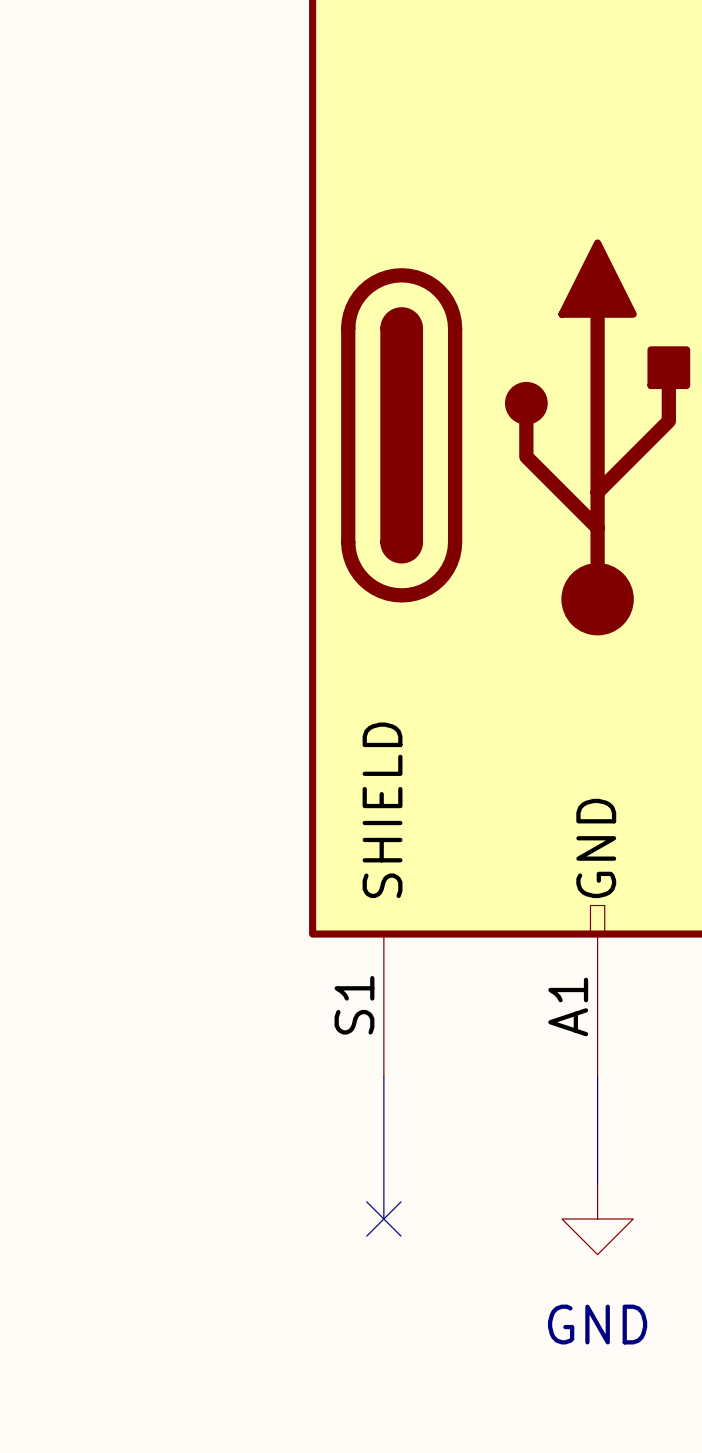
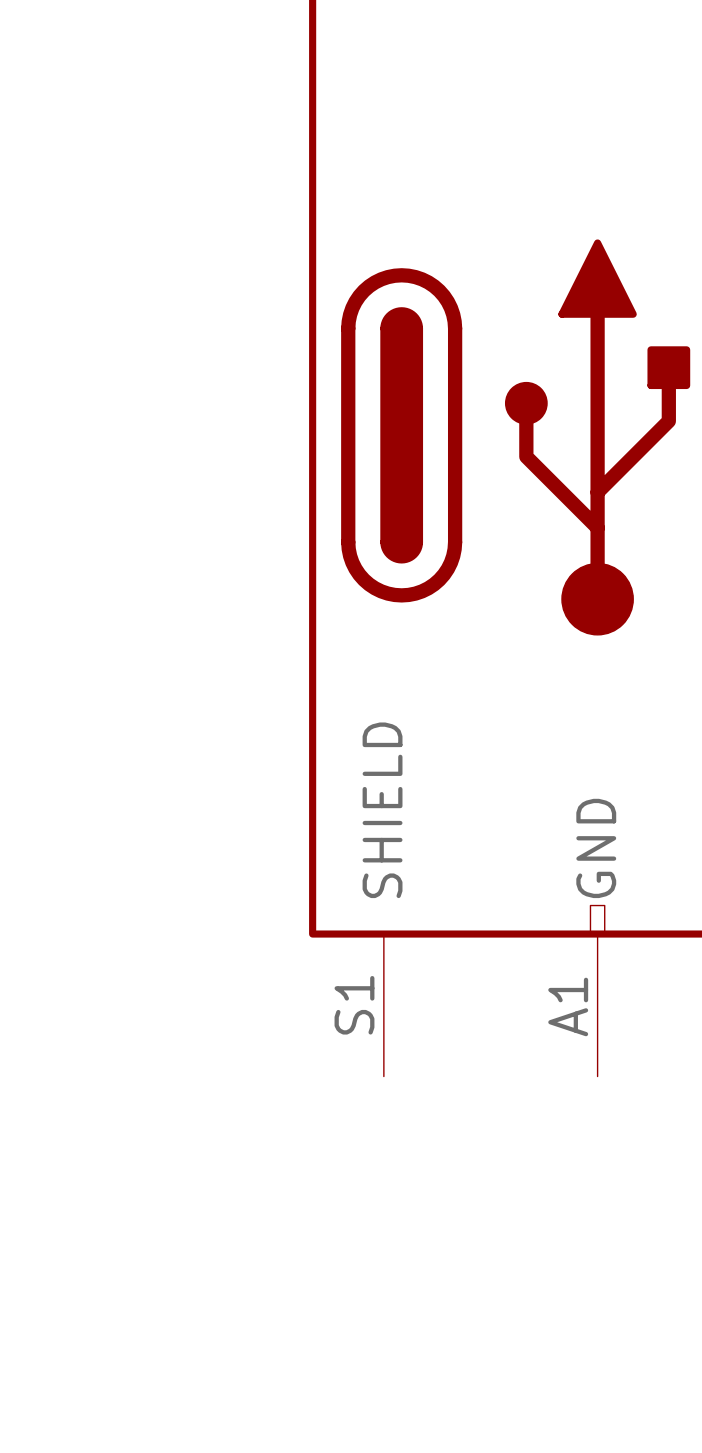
wire: (383, 1076) (383, 1219) -> none
wire: (597, 1076) (597, 1183) -> none
no-connect mark: (383, 1219) -> none
power symbol: GND (597, 1219) -> none

